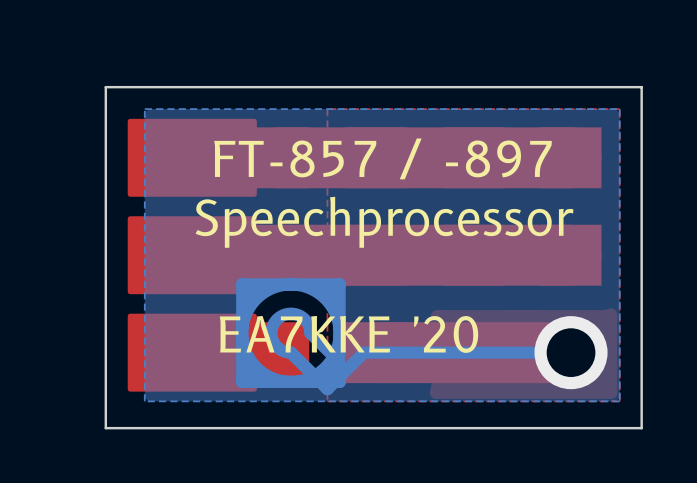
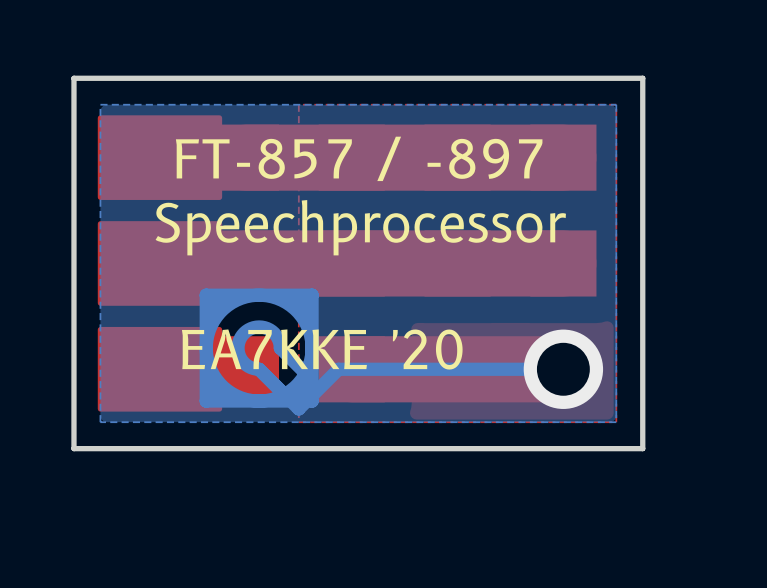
board edge: (641, 87) (641, 428) (105, 428) (105, 87) (641, 87) -> (642, 78) (642, 448) (73, 448) (73, 78) (642, 78)
drawing shape: [127, 118, 257, 197] -> [97, 115, 223, 200]
drawing shape: [127, 216, 257, 295] -> [97, 221, 223, 306]
drawing shape: [127, 313, 257, 392] -> [97, 326, 223, 412]

